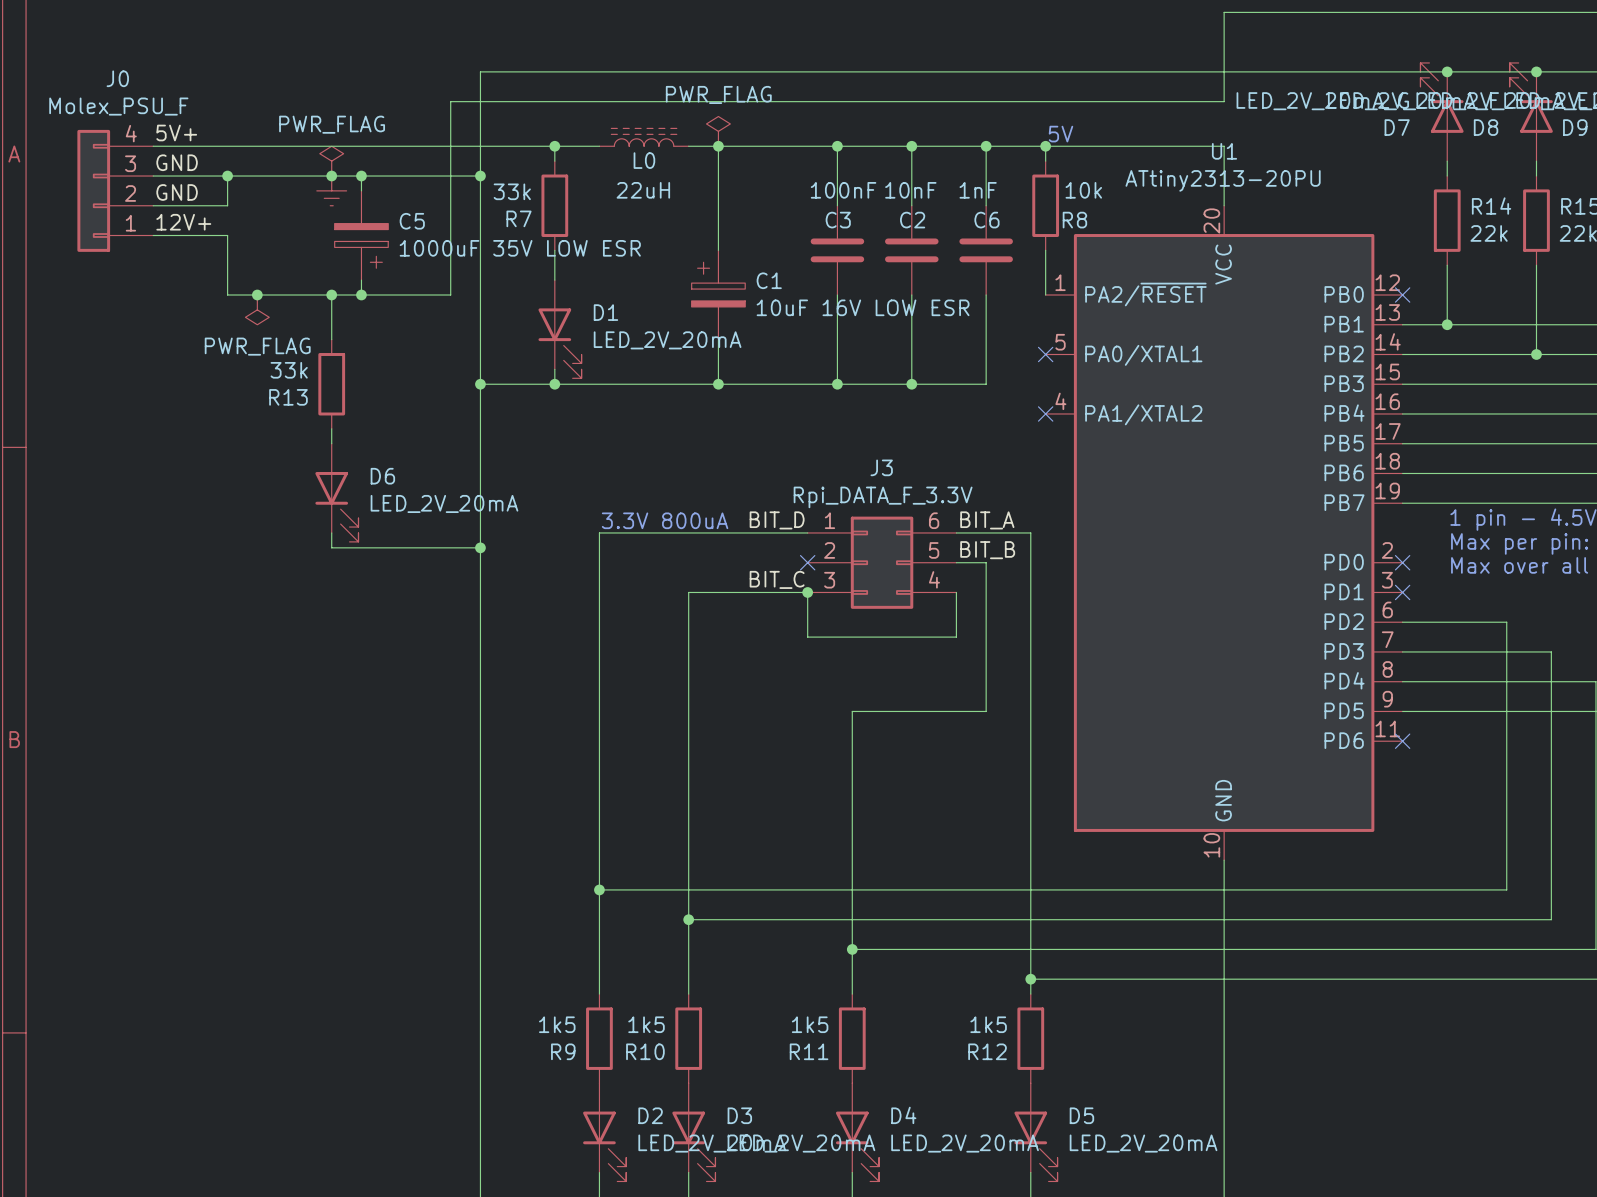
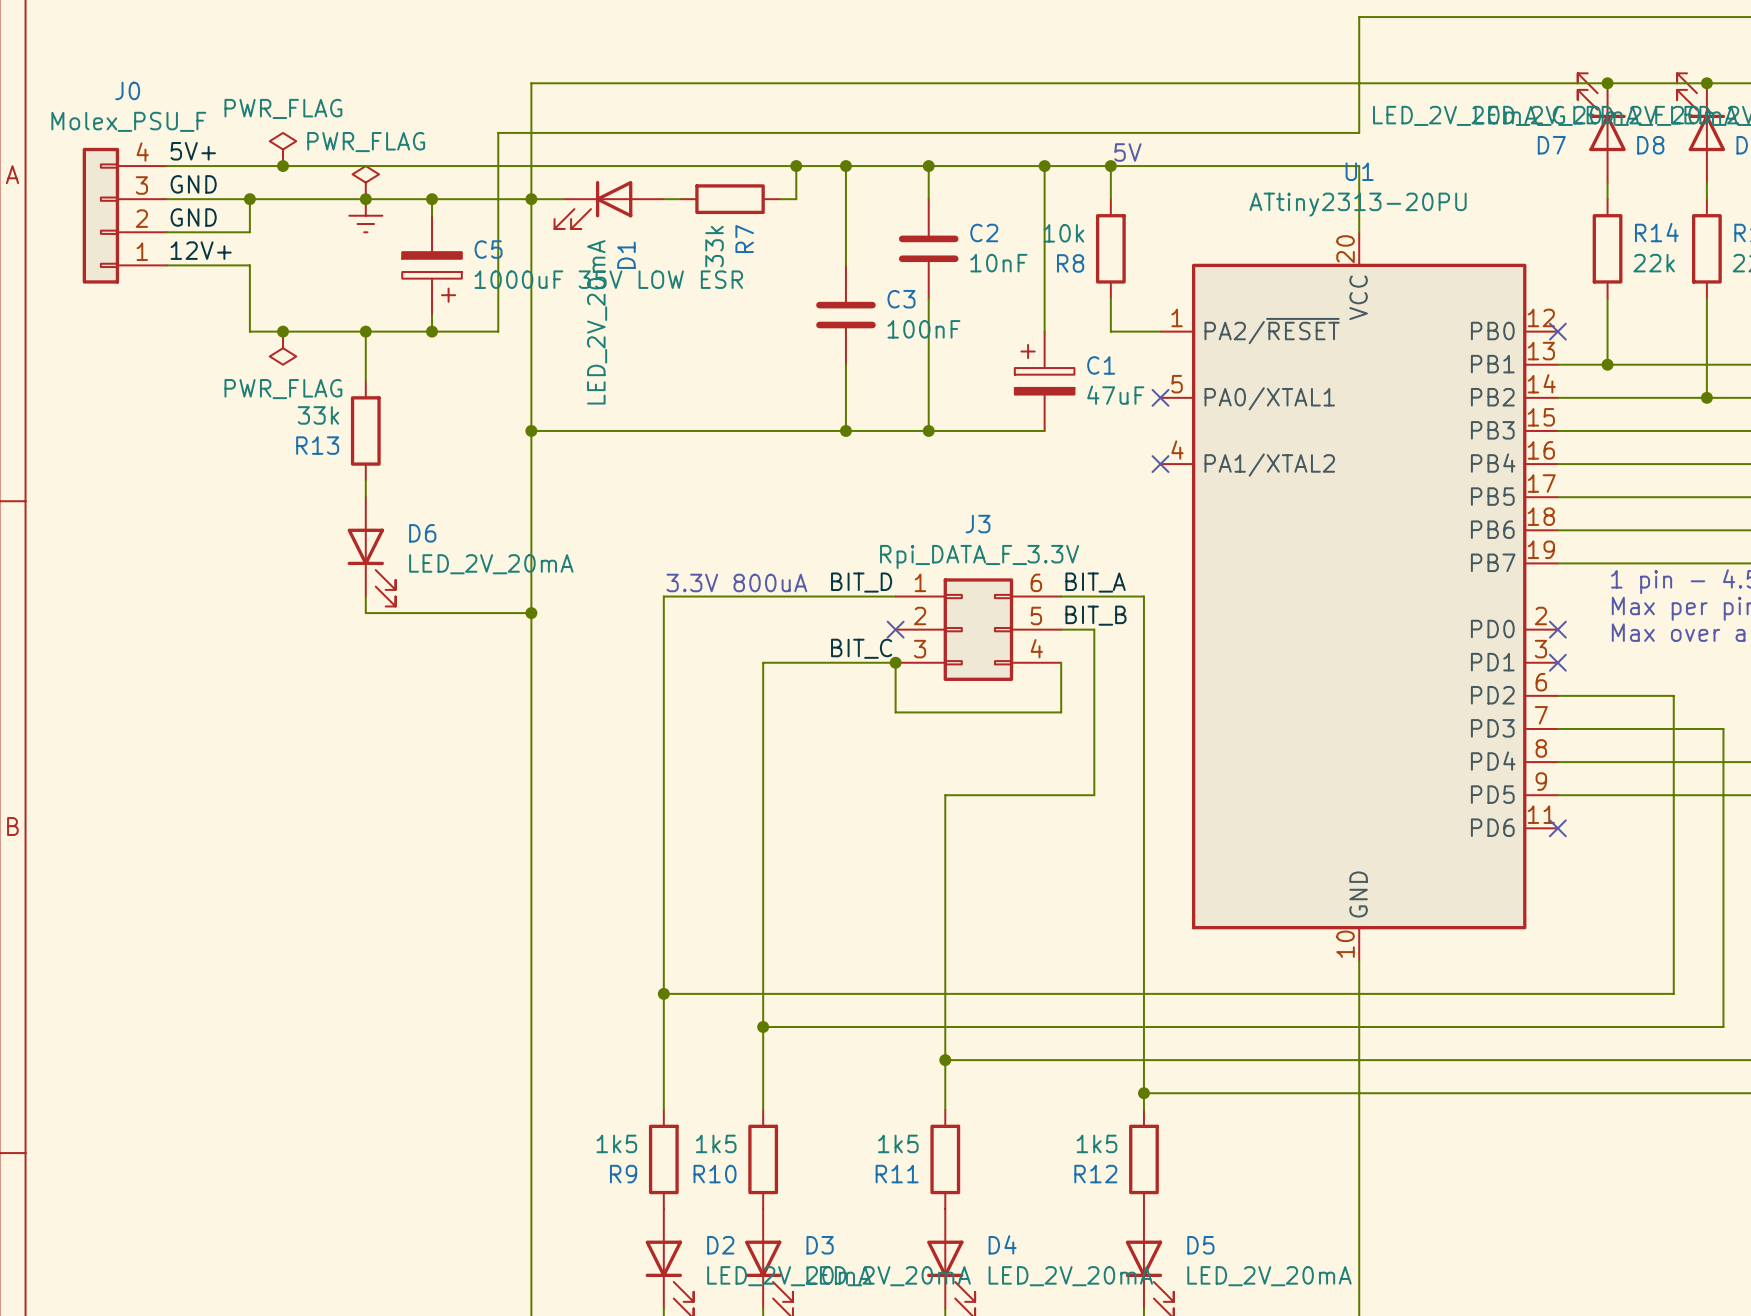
wire: (1224, 101) (450, 101) (450, 116) -> (1359, 116) (1359, 132) (498, 132)
power symbol: none -> PWR_FLAG (283, 149)
power symbol: PWR_FLAG (718, 131) -> none
text position: 5V (1060, 134) -> 5V (1127, 152)
L0: 22uH (644, 137) -> none
junction: none -> (283, 166)
wire: (554, 146) (554, 161) -> none
junction: (554, 146) -> none
wire: none -> (663, 166) (763, 166)
junction: none -> (845, 166)
wire: (911, 146) (911, 205) -> (845, 364) (845, 430)
junction: (911, 146) -> none
wire: none -> (1044, 166) (1044, 331)
junction: none -> (1044, 166)
wire: (986, 146) (986, 205) -> none
junction position: (986, 146) -> (1110, 166)
wire: none -> (1110, 166) (1110, 199)
wire: (1045, 146) (1045, 161) -> none
junction: (1045, 146) -> none
wire: (361, 176) (361, 190) -> (432, 199) (432, 215)
junction position: (361, 176) -> (432, 199)
wire: none -> (531, 199) (564, 199)
wire: none -> (663, 199) (680, 199)
wire: (718, 176) (718, 250) -> (796, 199) (779, 199)
C3 value position: 100nF (843, 190) -> 100nF (923, 329)
C2 value position: 10nF (910, 190) -> 10nF (998, 263)
R8 value position: 10k (1083, 190) -> 10k (1063, 233)
R7 value position: 33k (512, 191) -> 33k (714, 246)
R7 rotation: 0° (554, 205) -> 90° clockwise (730, 199)
R7 position: (554, 205) -> (730, 199)
R8 position: (1045, 205) -> (1110, 248)
R7 name position: R7 (519, 218) -> R7 (744, 239)
C3 name position: C3 (838, 220) -> C3 (901, 299)
C2 name position: C2 (912, 220) -> C2 (984, 232)
R8 name position: R8 (1074, 220) -> R8 (1070, 263)
C5 position: (361, 235) -> (432, 265)
wire: (554, 250) (554, 280) -> none
C3 position: (837, 250) -> (845, 315)
C2 position: (911, 250) -> (928, 248)
C6: 1nF (986, 250) -> none
wire: (1045, 250) (1045, 295) -> (1110, 298) (1110, 331) (1160, 331)
wire: (361, 280) (361, 295) -> (432, 315) (432, 331)
junction position: (361, 295) -> (432, 331)
C1 position: (718, 295) -> (1044, 381)
wire: (911, 295) (911, 384) -> (845, 166) (845, 265)
wire: (986, 295) (986, 384) (941, 384) -> none
C1 value: 10uF 16V LOW ESR (863, 307) -> 47uF (1115, 395)
D1 position: (560, 329) -> (609, 204)
wire: (718, 339) (718, 384) -> none
D1 rotation: 0° (560, 343) -> 90° clockwise (593, 204)
wire: (554, 369) (554, 384) -> none
junction: (554, 384) -> none
junction position: (718, 384) -> (845, 430)
junction: (911, 384) -> none

